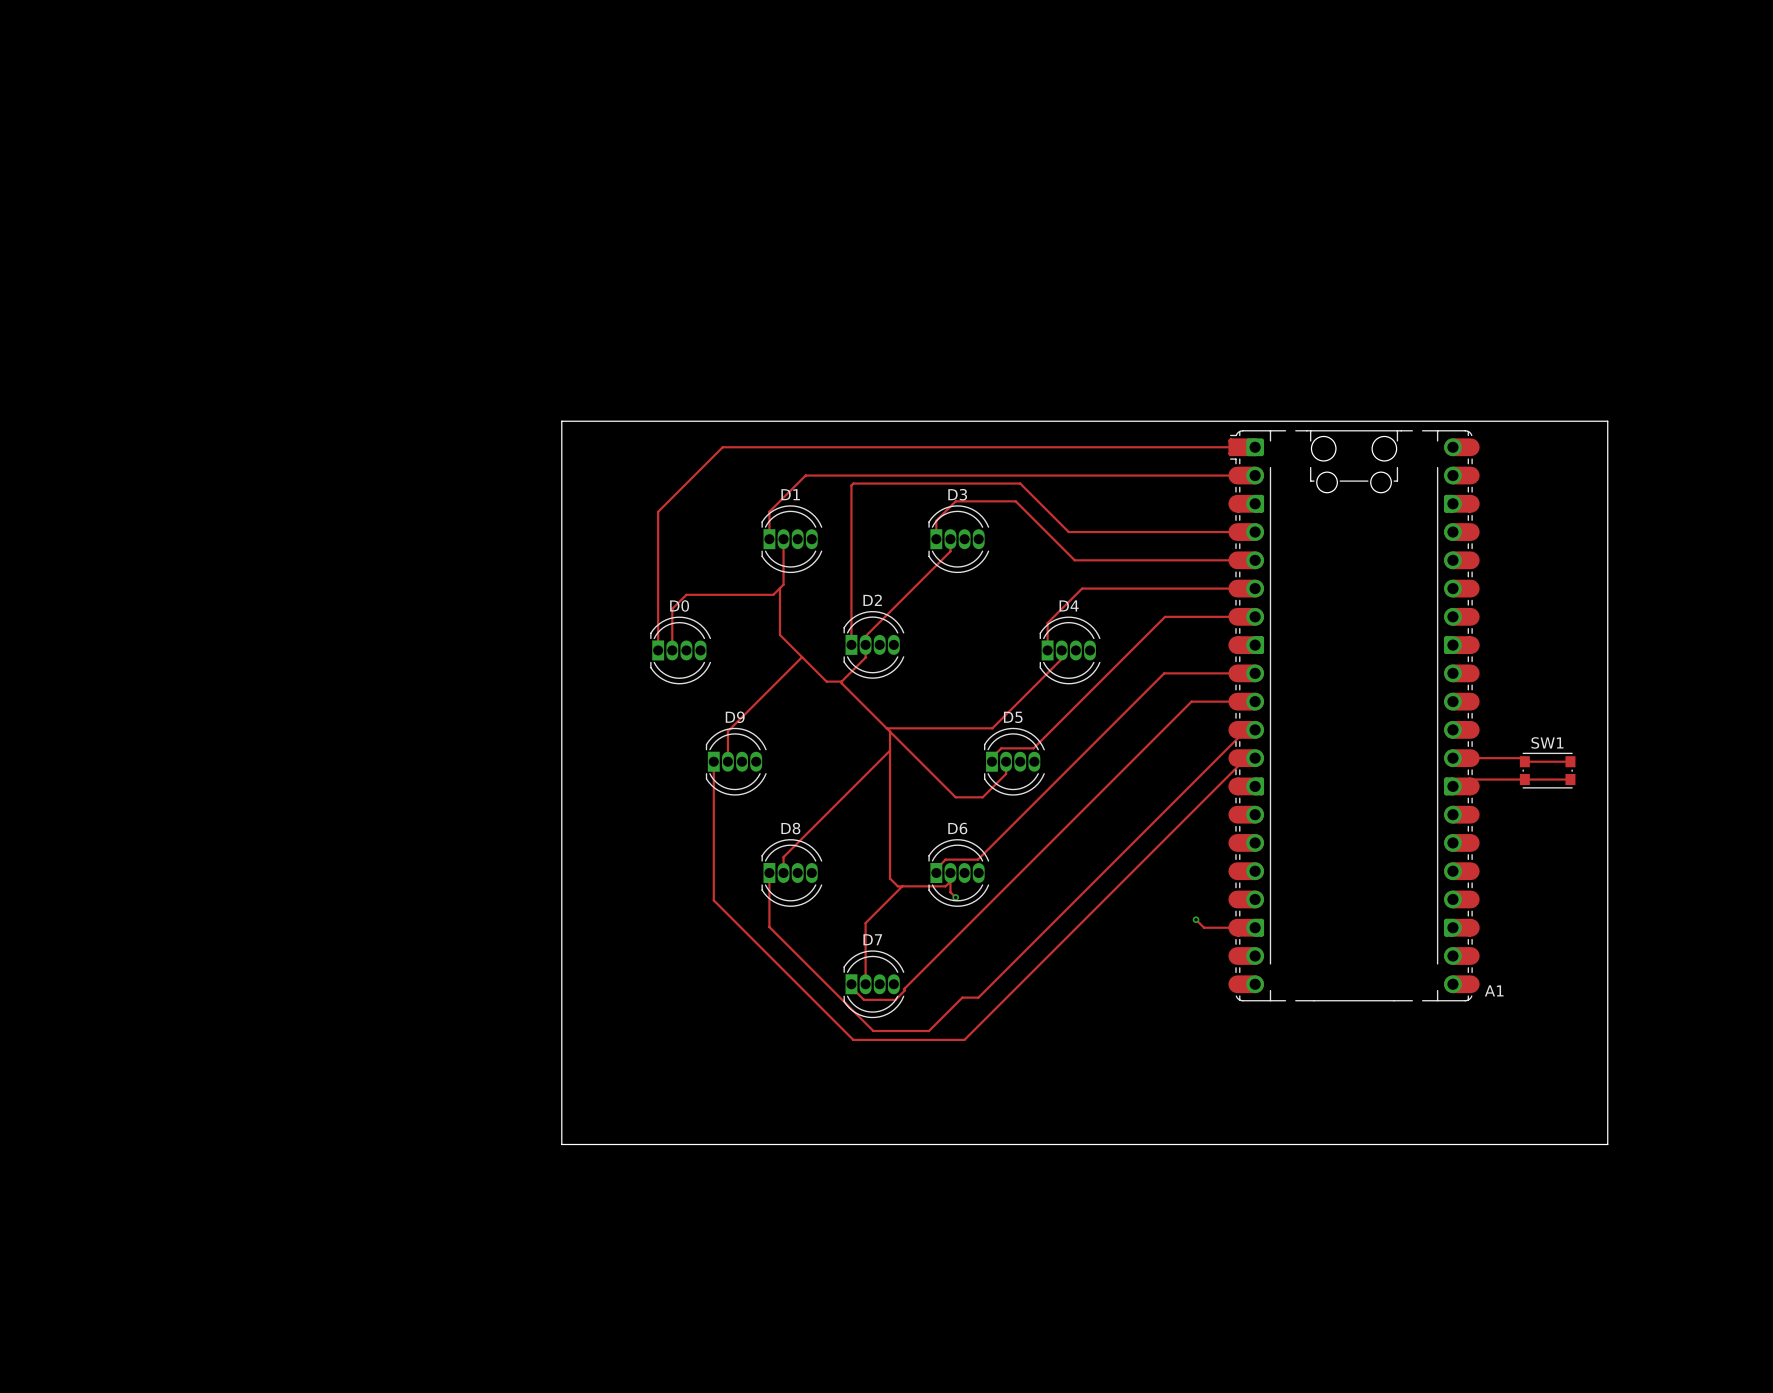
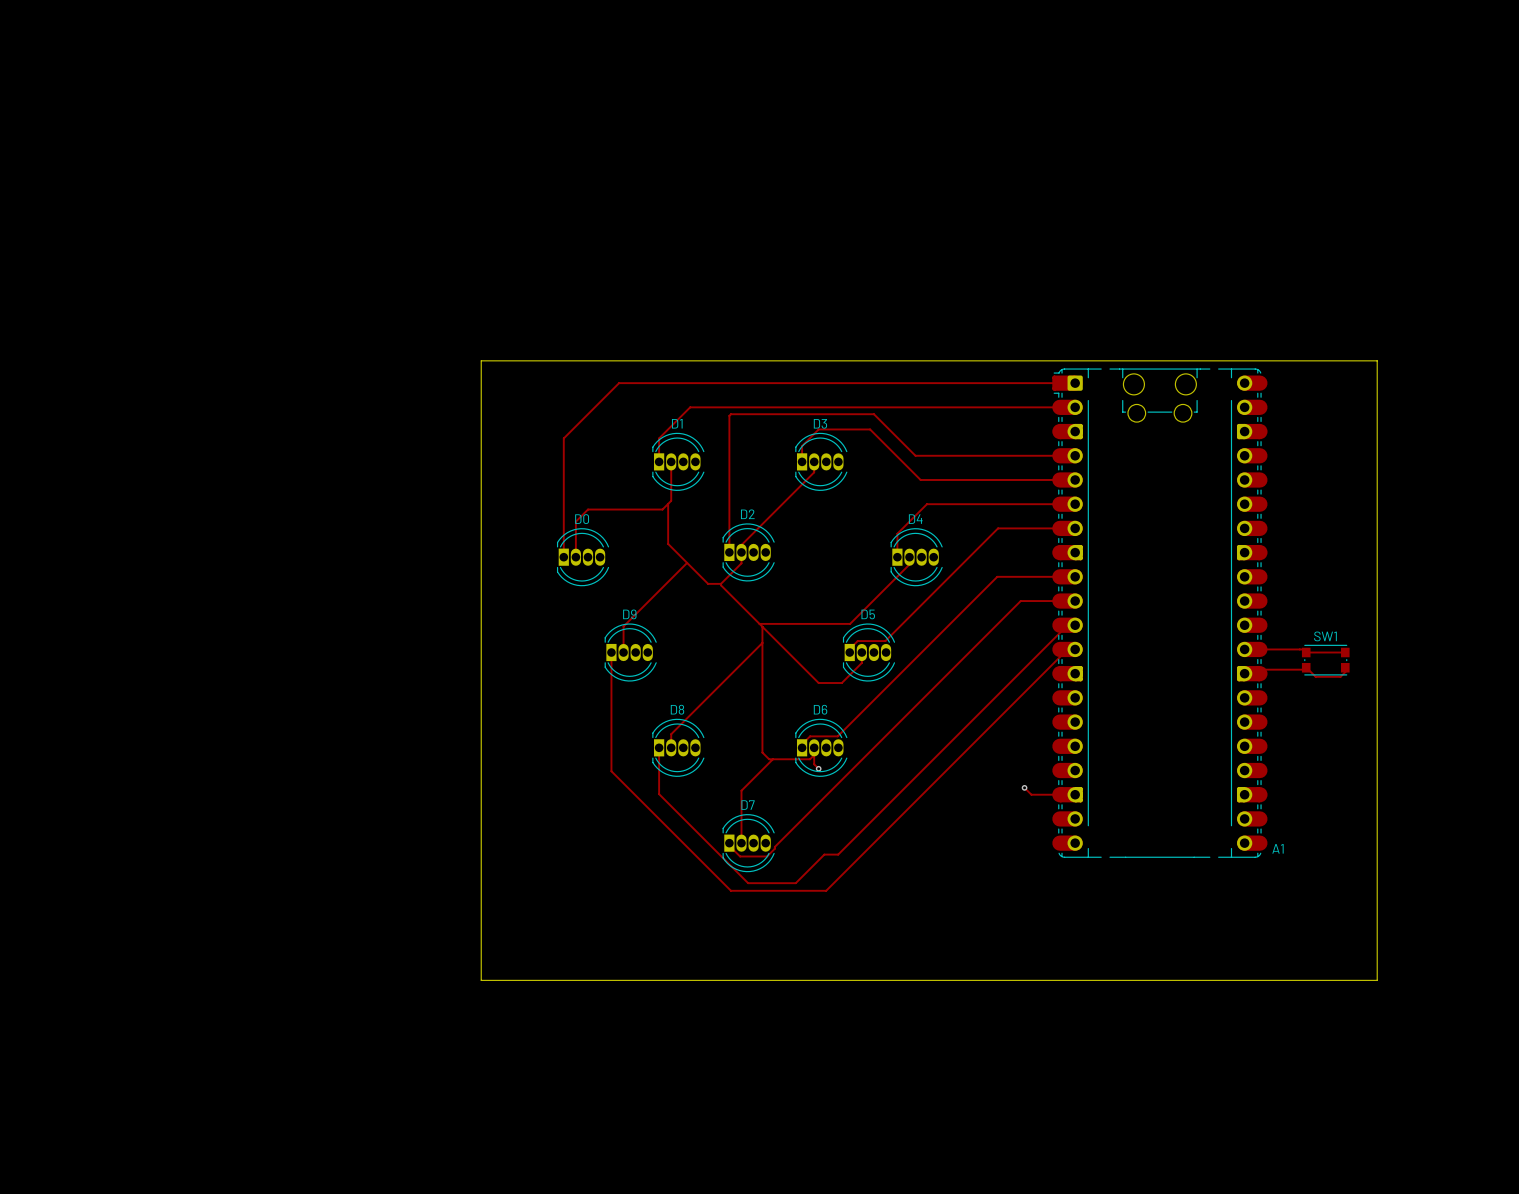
track: (1570, 779) (1468, 779) (1466, 781) -> (1308, 669) (1256, 669)
track: none -> (1308, 669) (1315, 676) (1340, 676) (1347, 669)

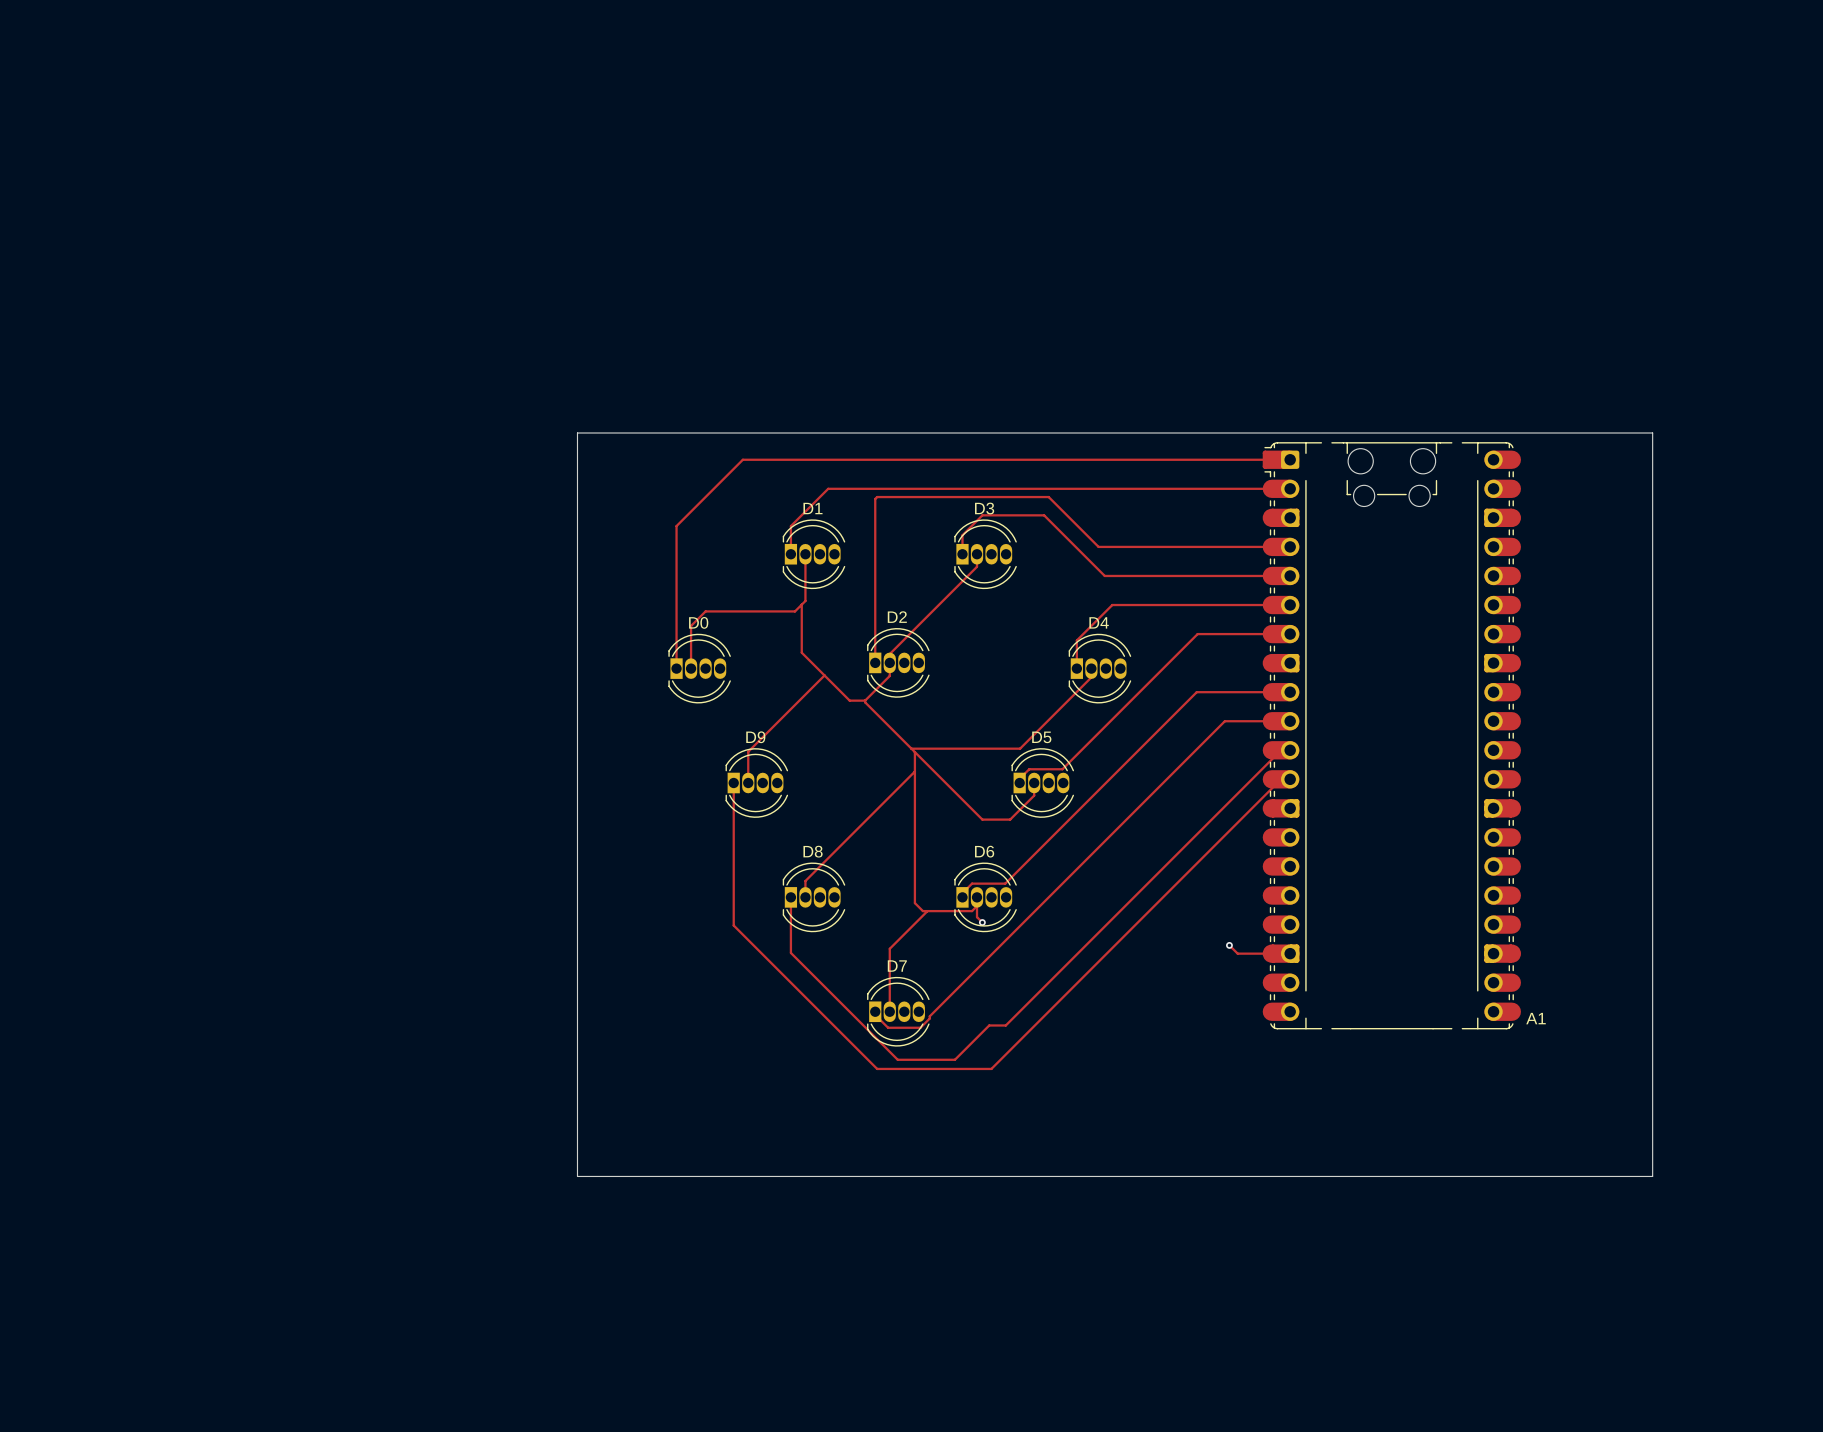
track: (1252, 649) (1303, 649) (1306, 652) (1345, 652) -> none
SW1: (1325, 660) -> none
track: (1308, 669) (1256, 669) (1252, 673) -> none
track: (1308, 669) (1315, 676) (1340, 676) (1347, 669) -> none

